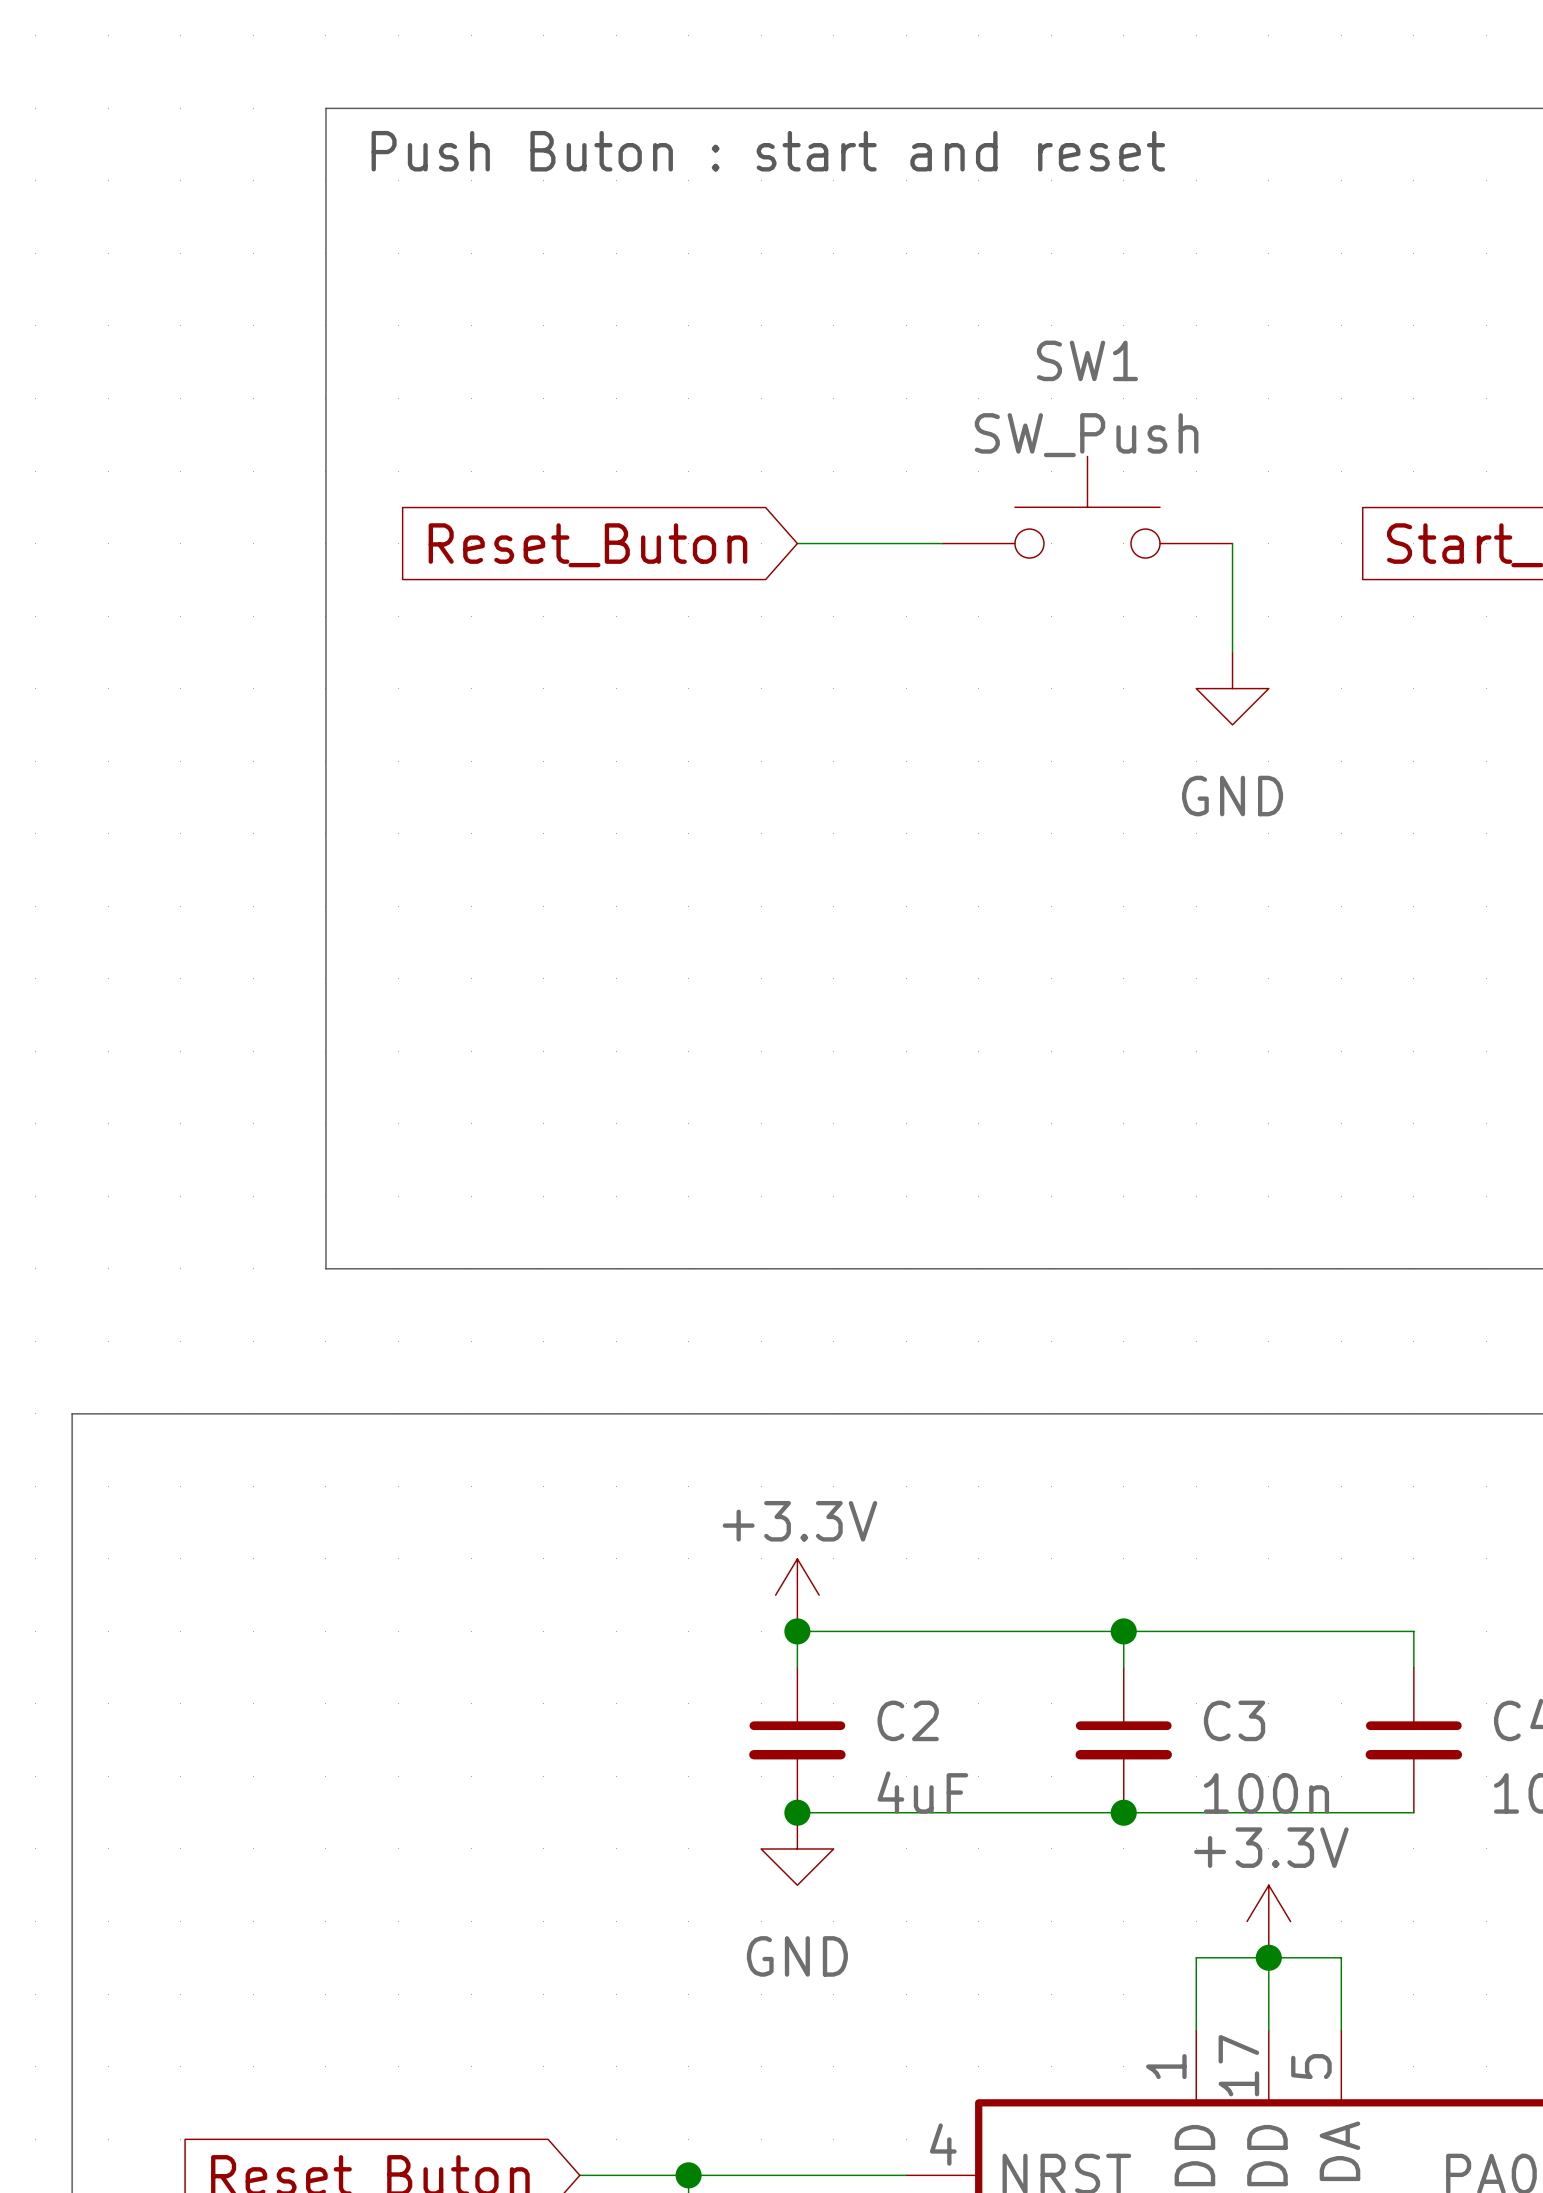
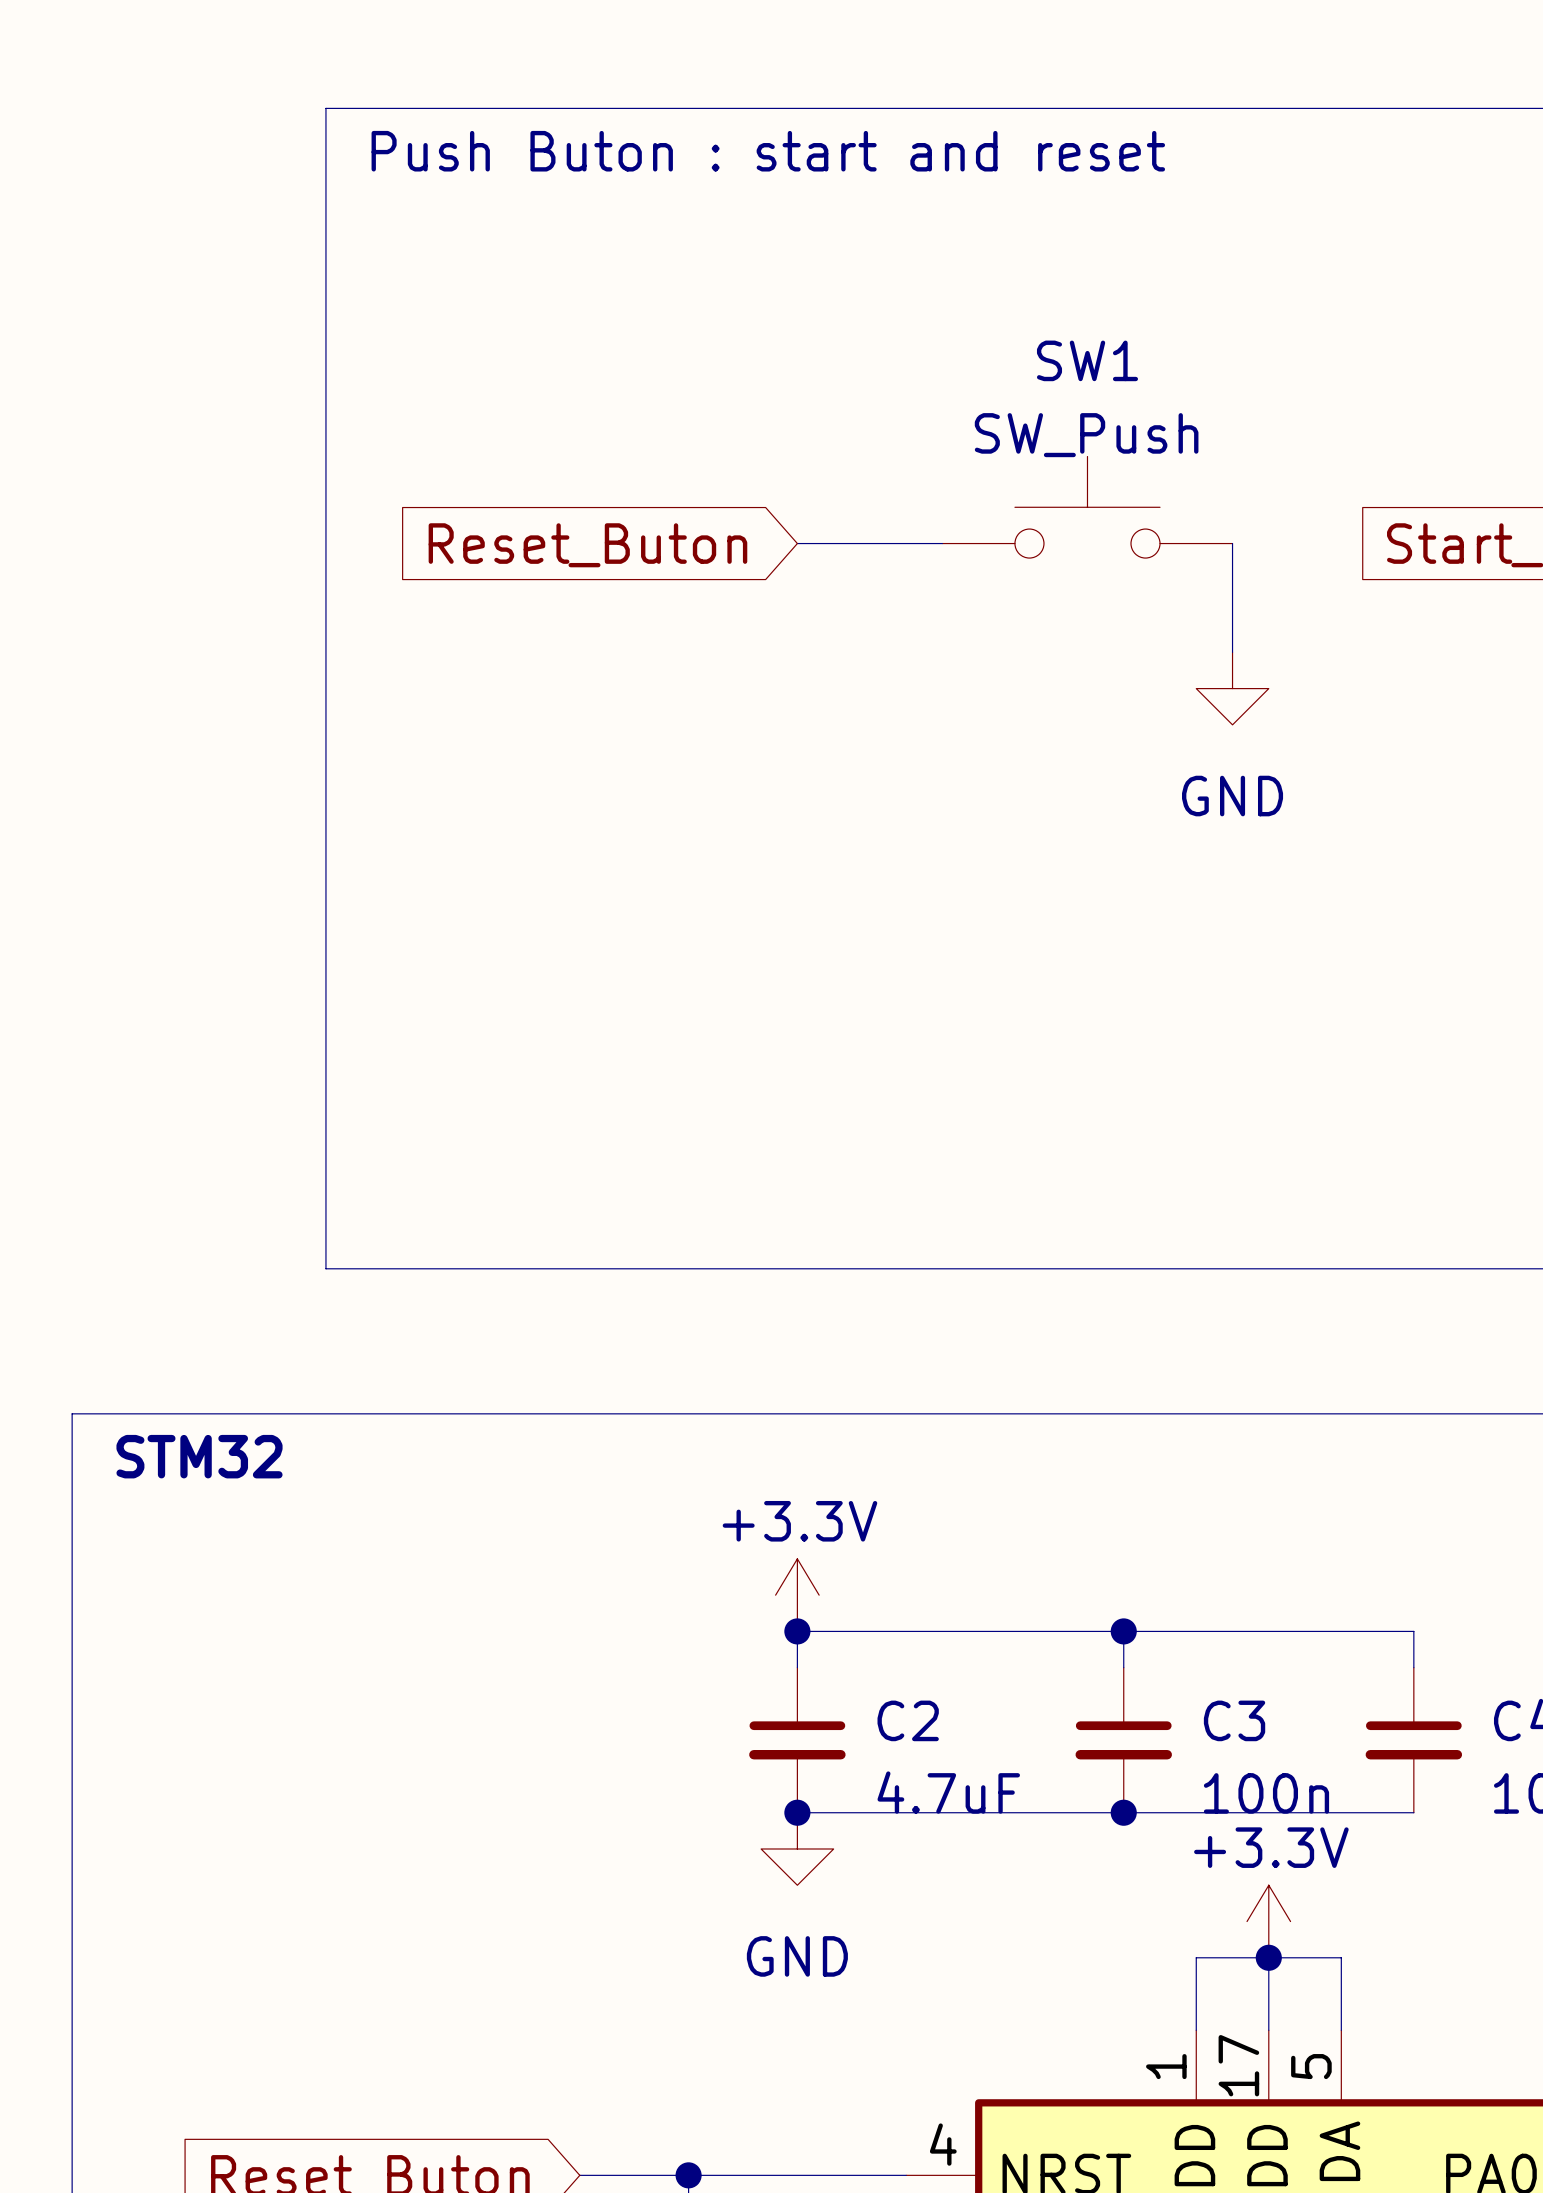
text: none -> STM32 (199, 1456)
C2 value: 4uF (922, 1792) -> 4.7uF (948, 1792)

